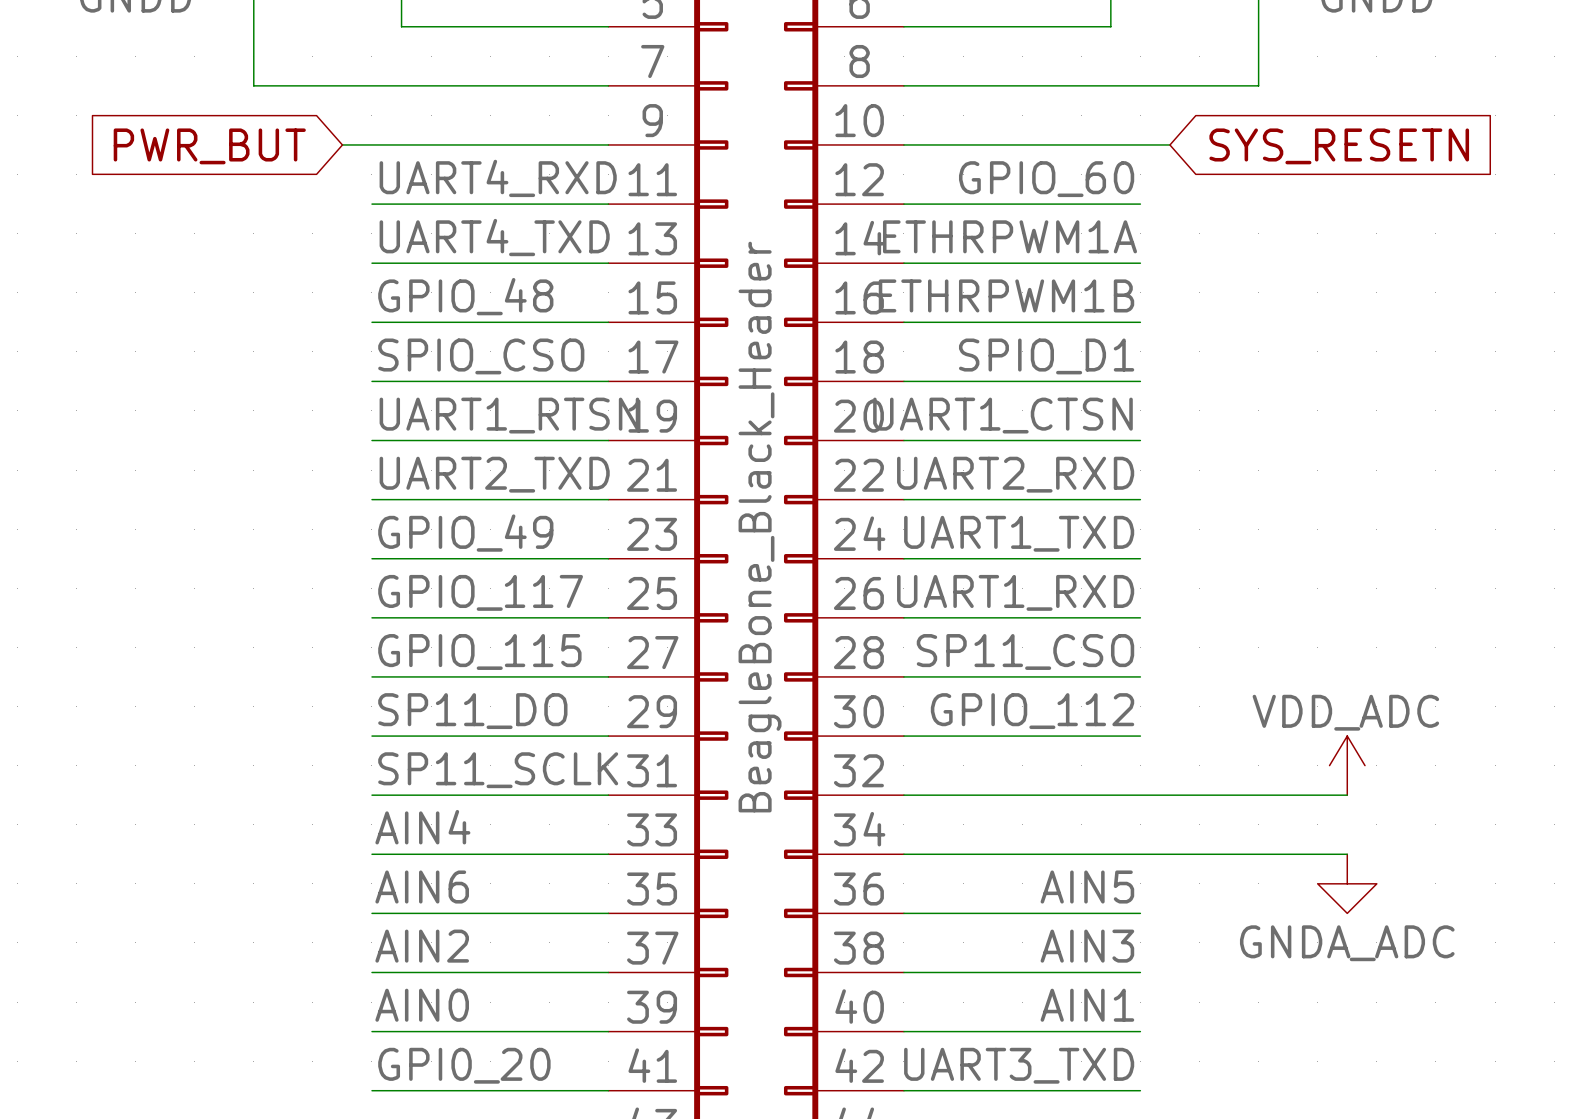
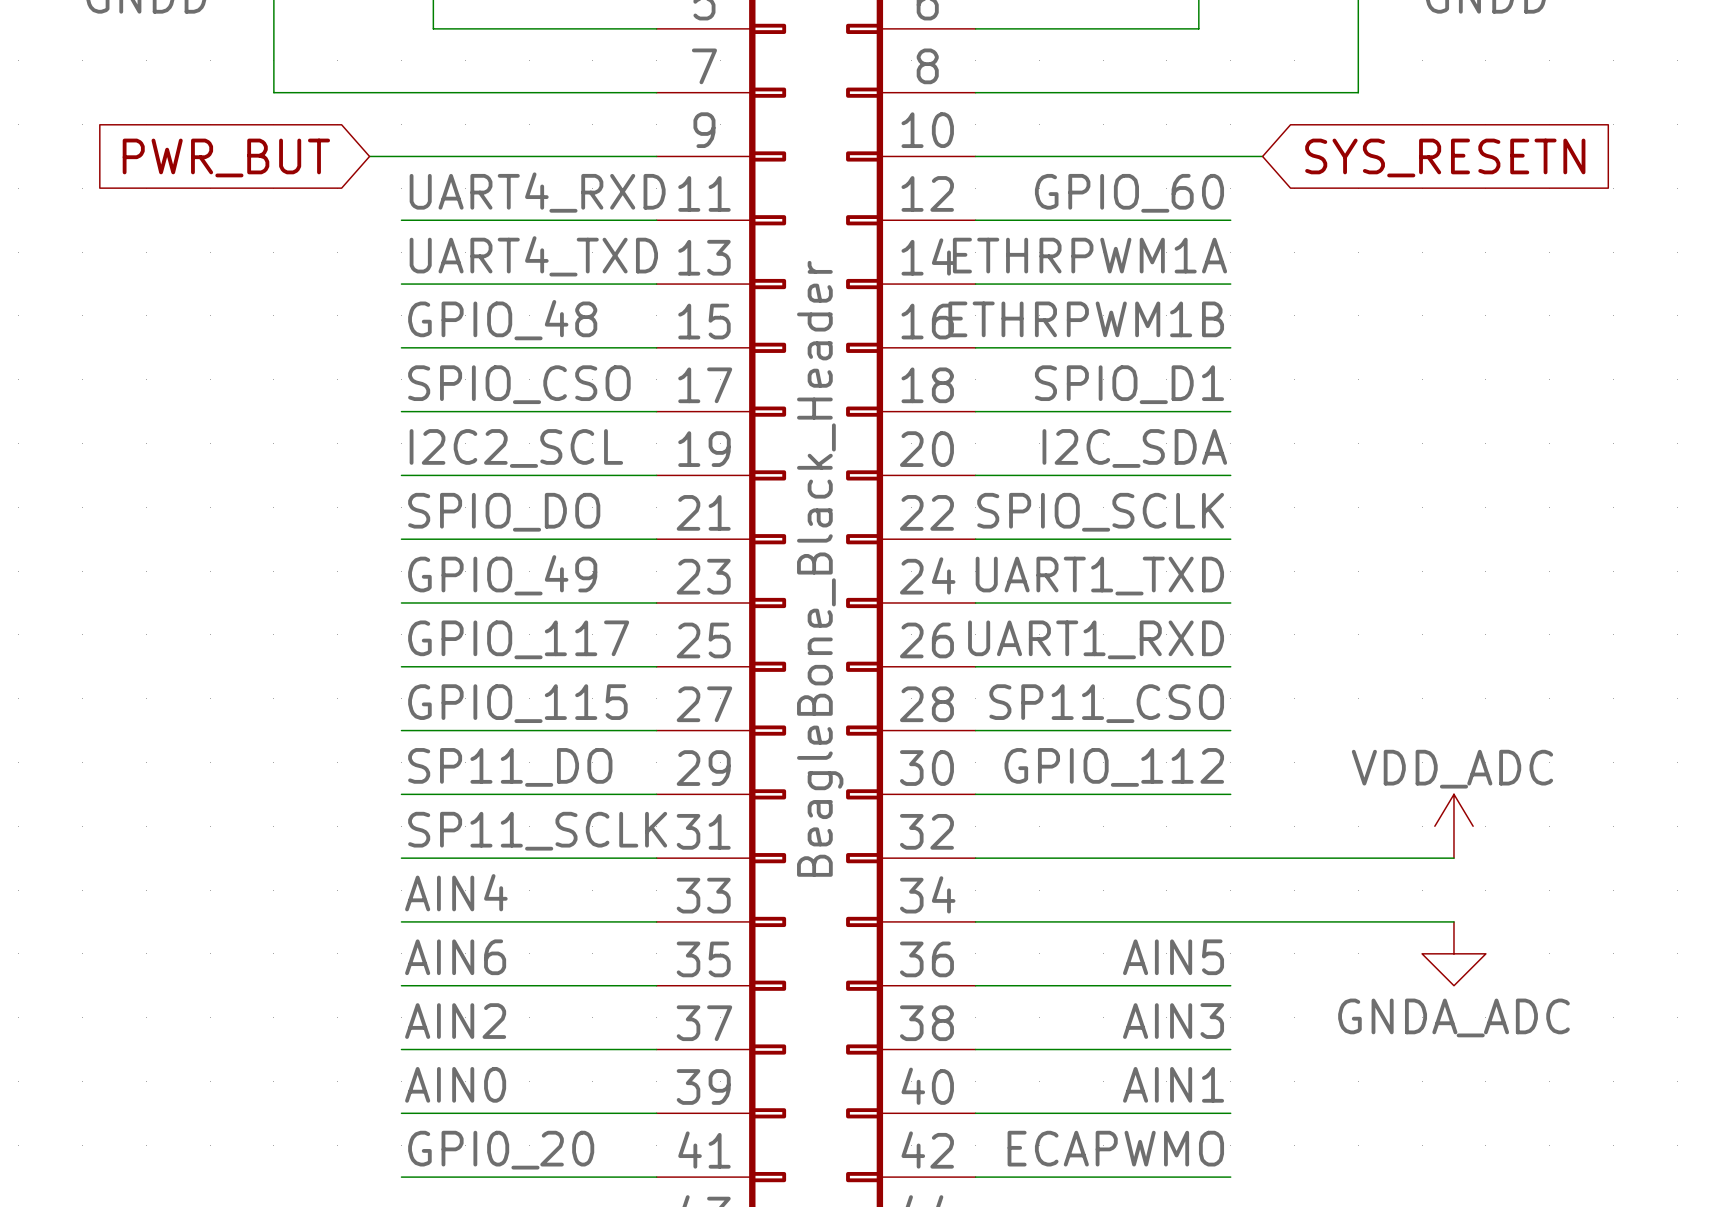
label: UART1_RTSN (509, 415) -> I2C2_SCL (516, 448)
label: UART1_CTSN (1002, 415) -> I2C_SDA (1134, 448)
label: UART2_TXD (494, 474) -> SPIO_DO (504, 512)
label: UART2_RXD (1015, 474) -> SPIO_SCLK (1100, 512)
label: UART3_TXD (1019, 1065) -> ECAPWMO (1115, 1148)

